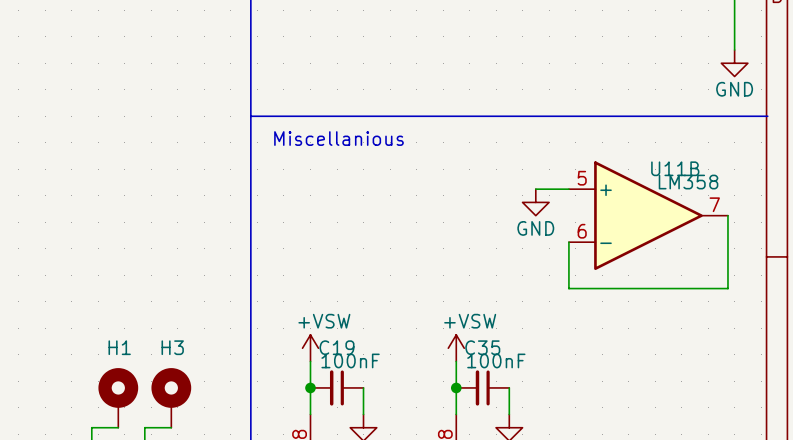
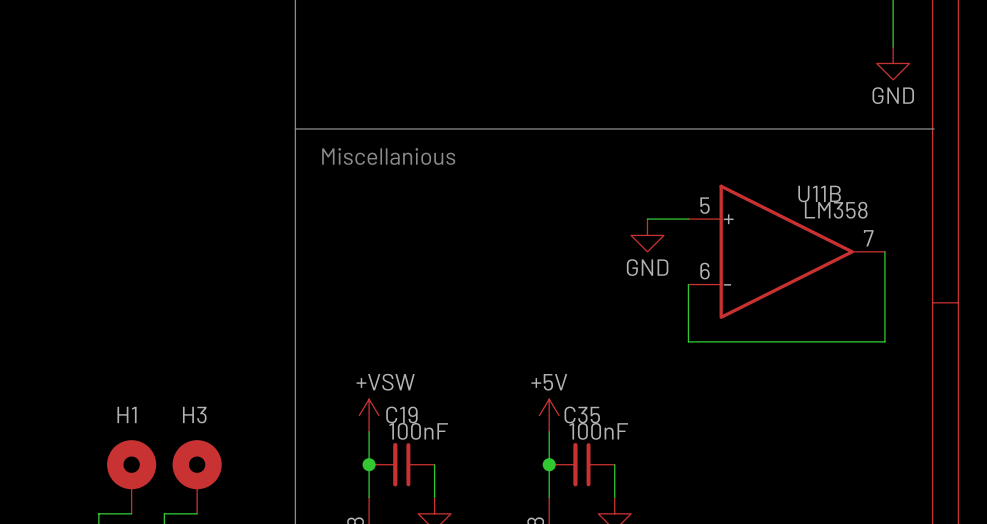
power symbol: +VSW (456, 348) -> +5V (549, 415)

